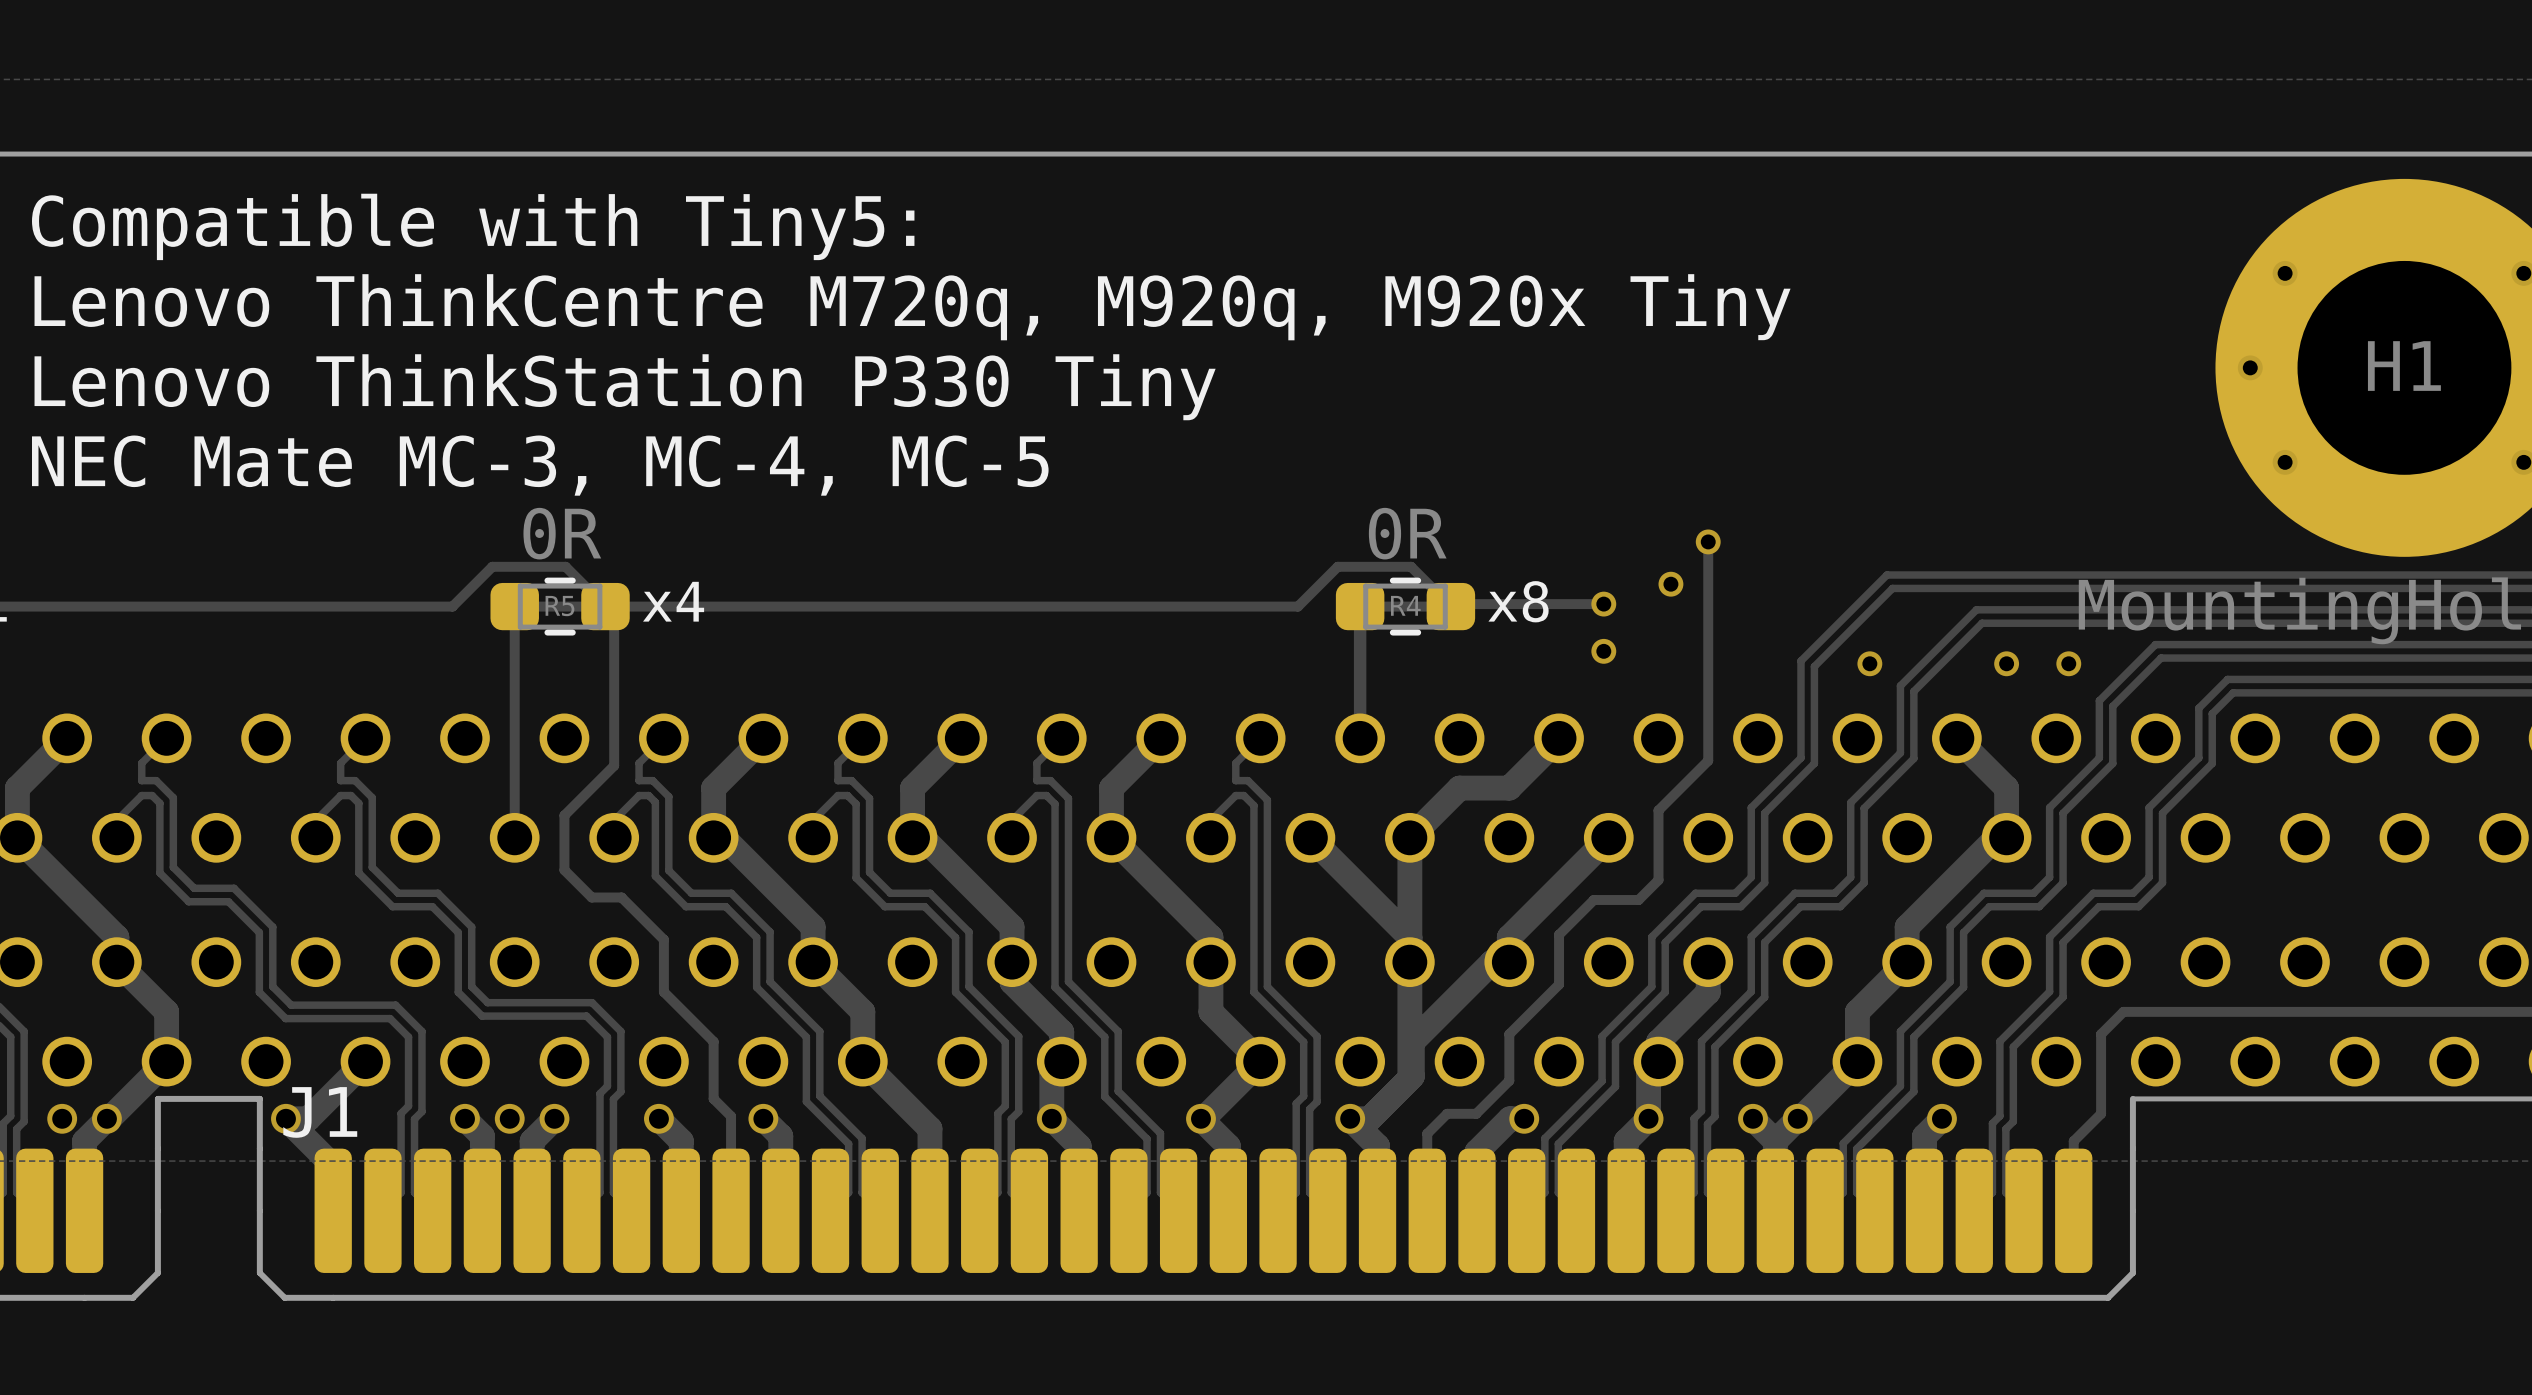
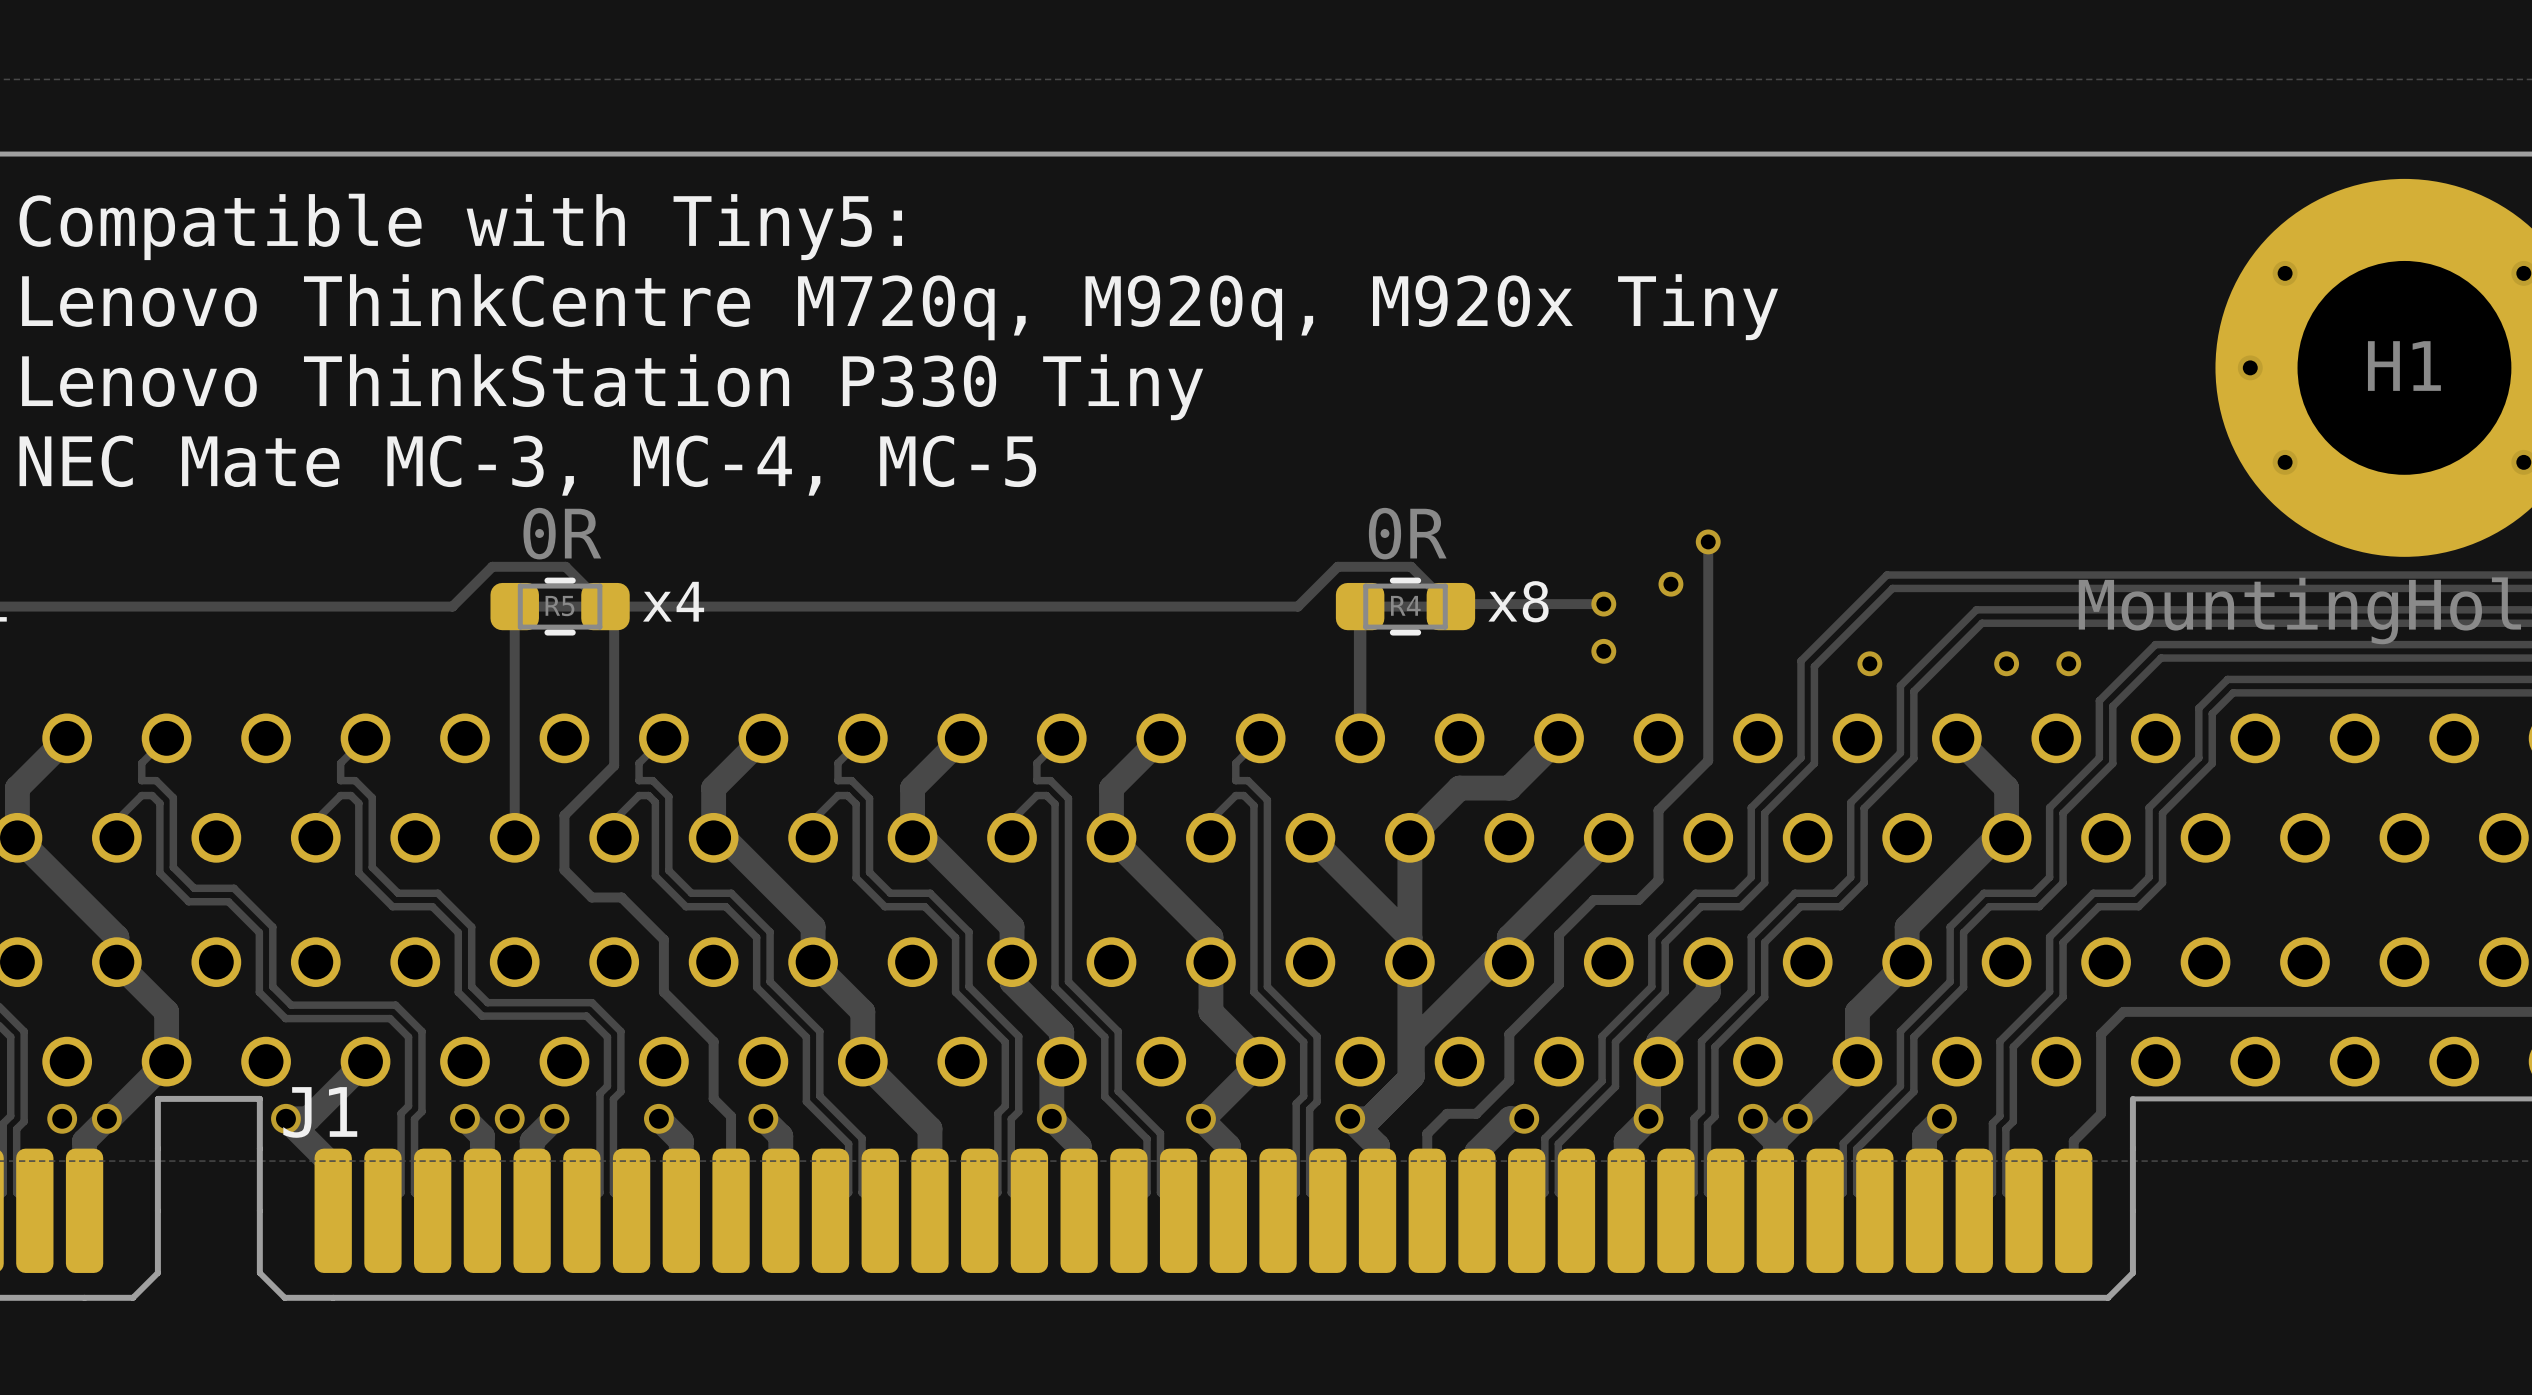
text position: Compatible with Tiny5: (473, 226) -> Compatible with Tiny5: (460, 226)
text position: Lenovo ThinkCentre M720q, M920q, M920x Tiny (912, 307) -> Lenovo ThinkCentre M720q, M920q, M920x Tiny (900, 307)
text position: Lenovo ThinkStation P330 Tiny (625, 387) -> Lenovo ThinkStation P330 Tiny (612, 387)
text position: NEC Mate MC-3, MC-4, MC-5 (540, 465) -> NEC Mate MC-3, MC-4, MC-5 (527, 465)

